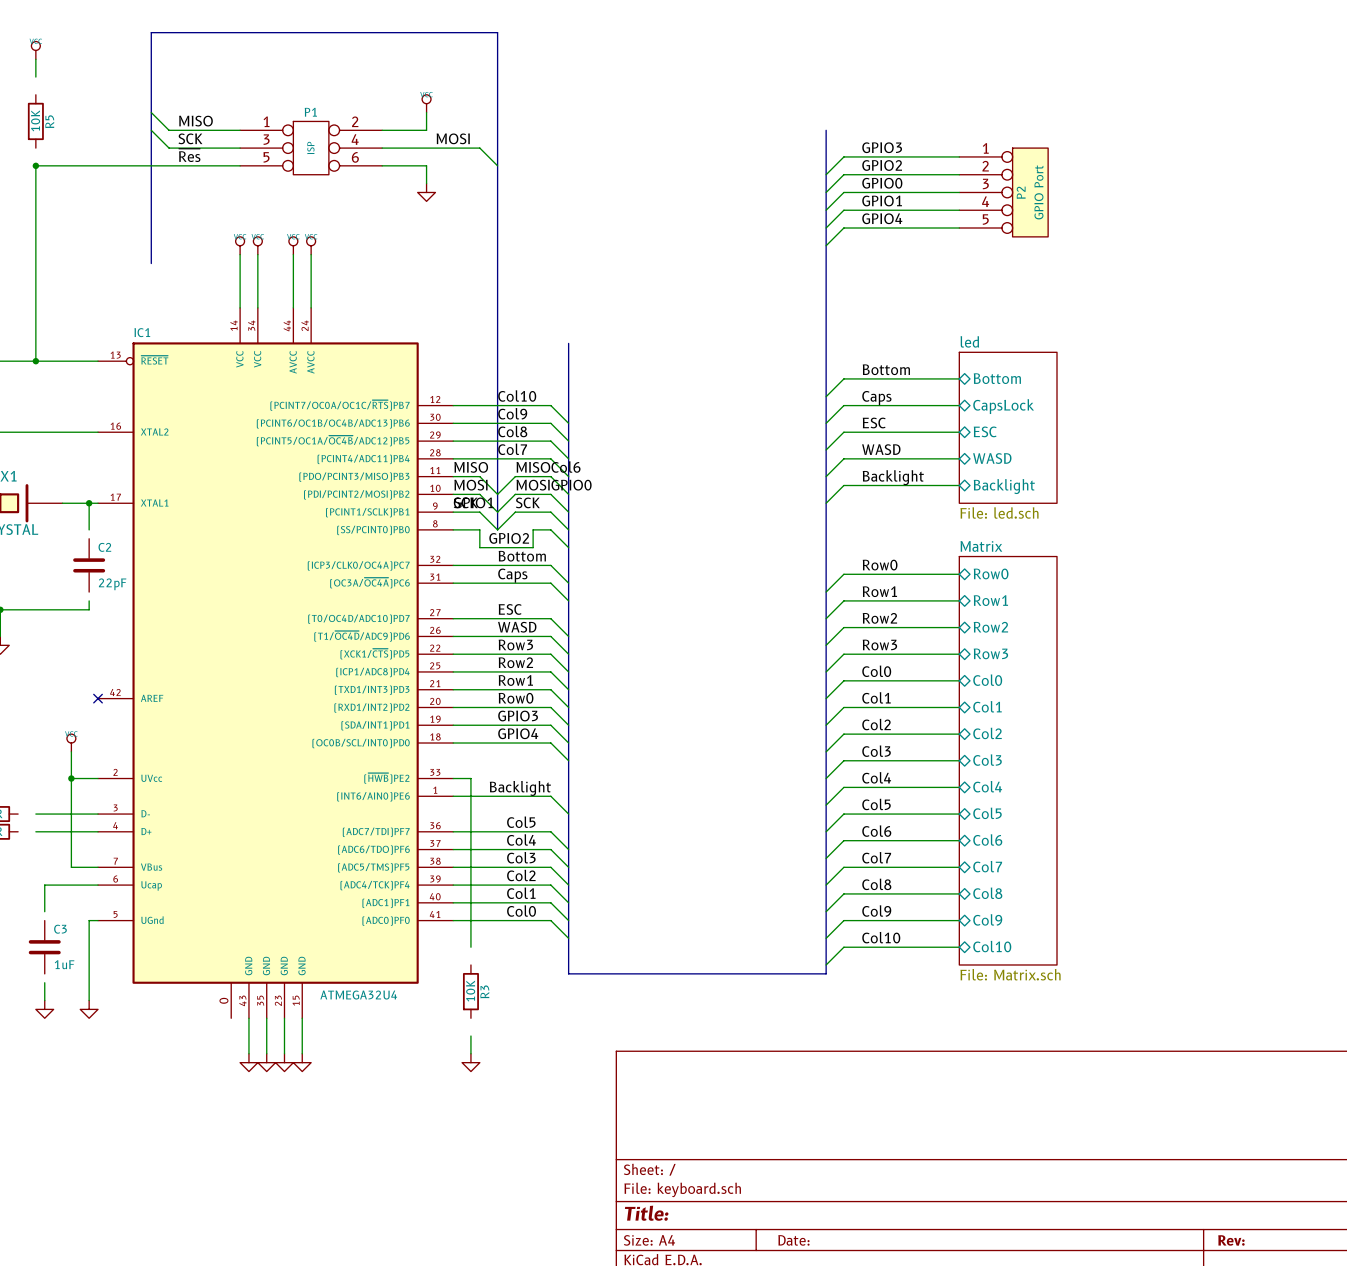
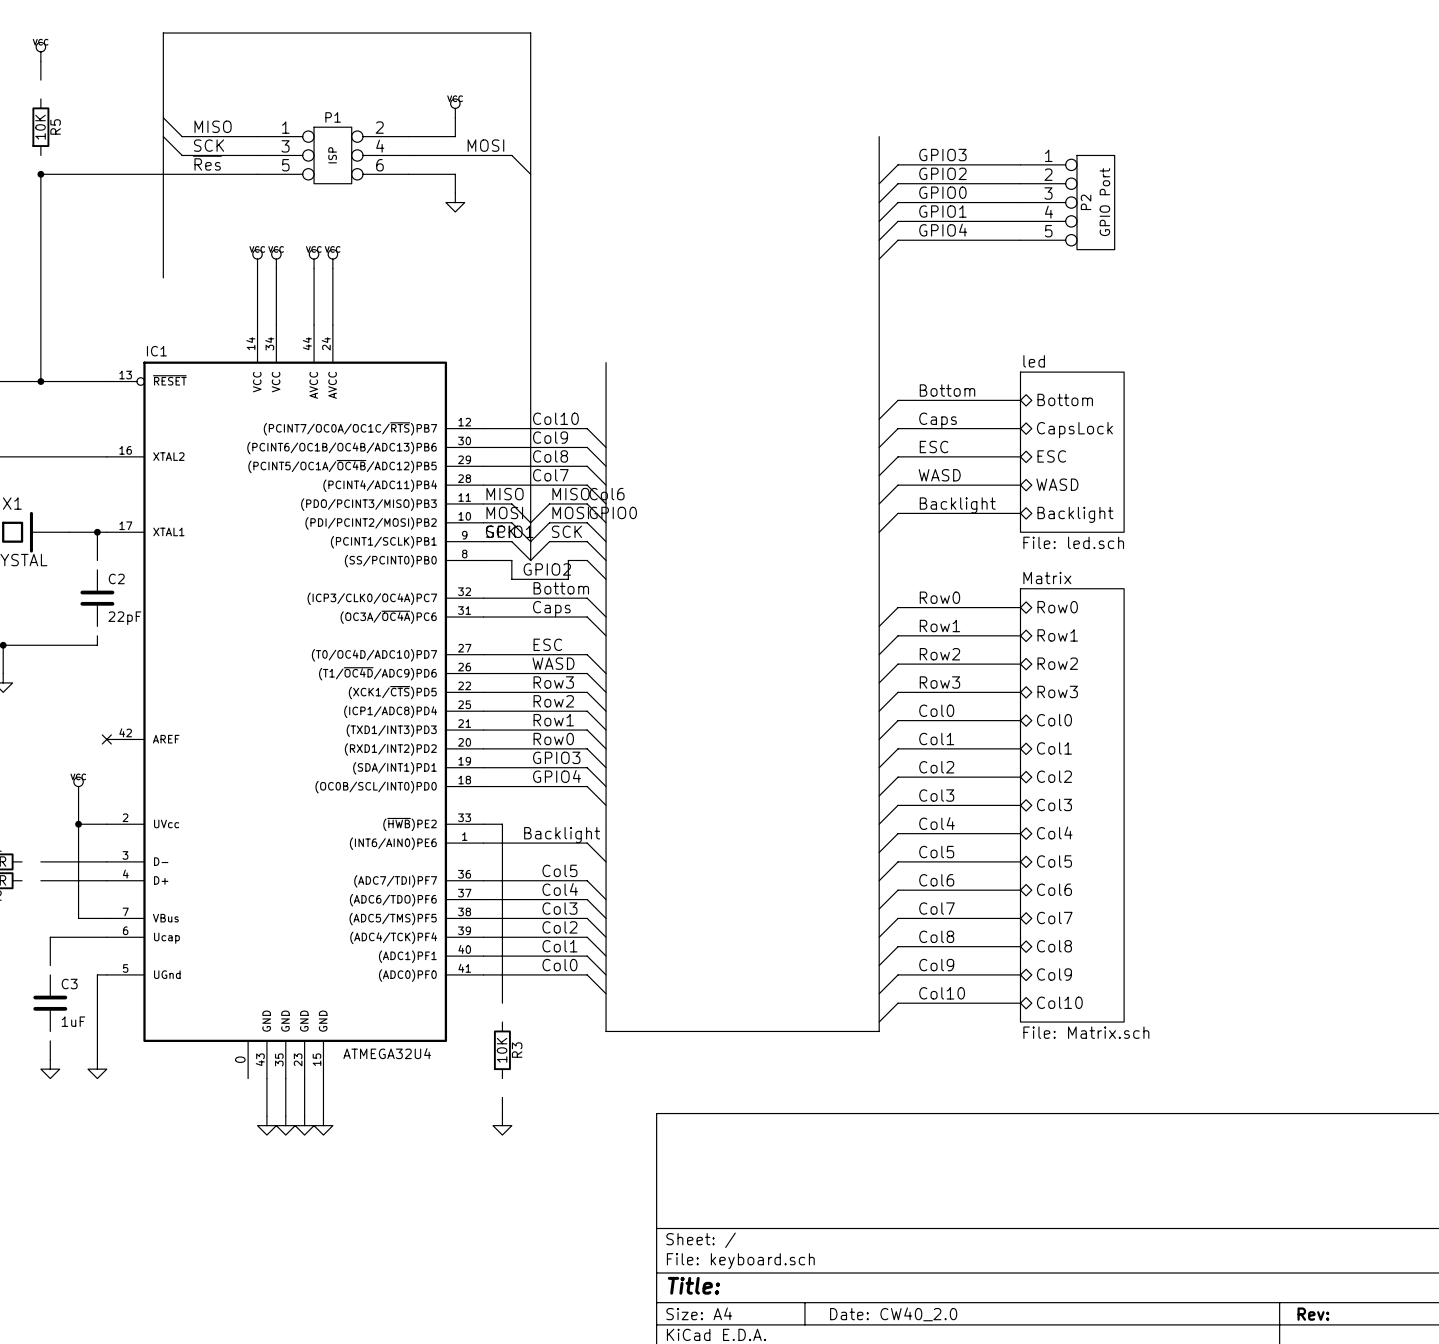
title block: Date: (793, 1240) -> Date: CW40_2.0 (893, 1314)

